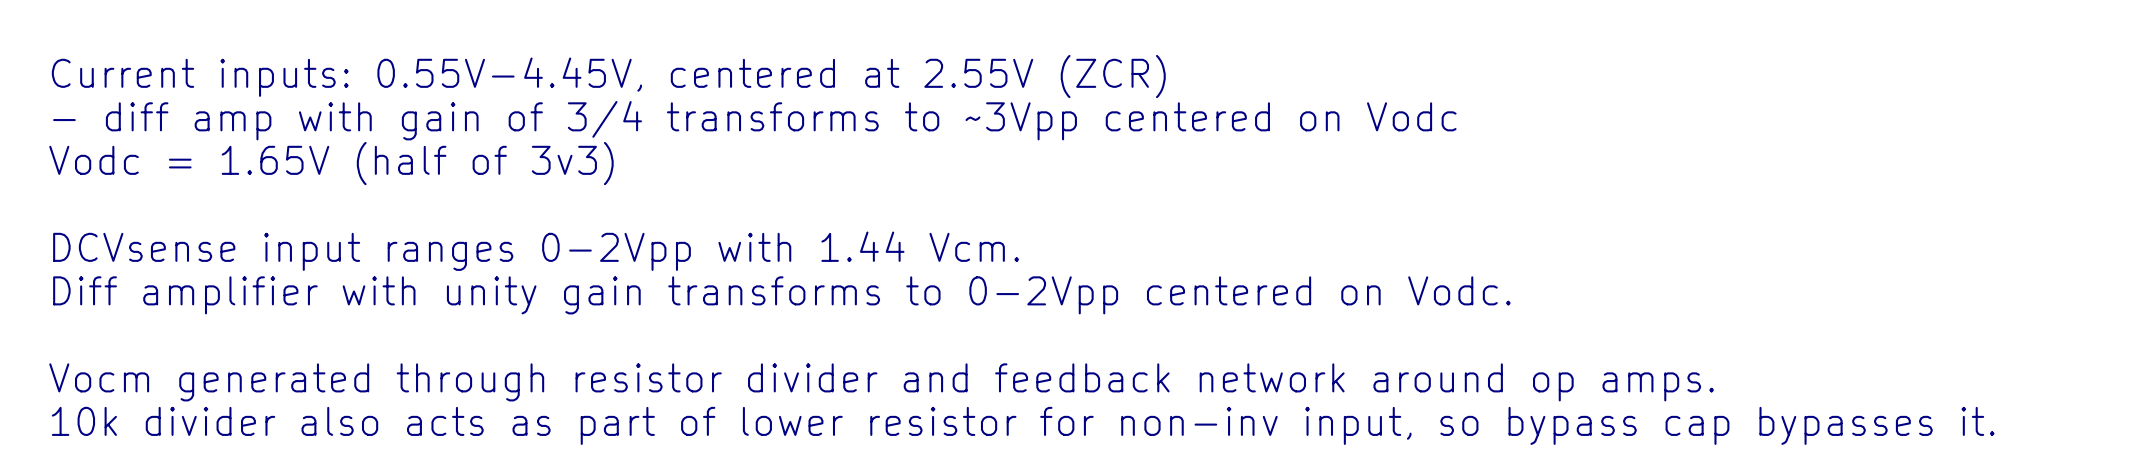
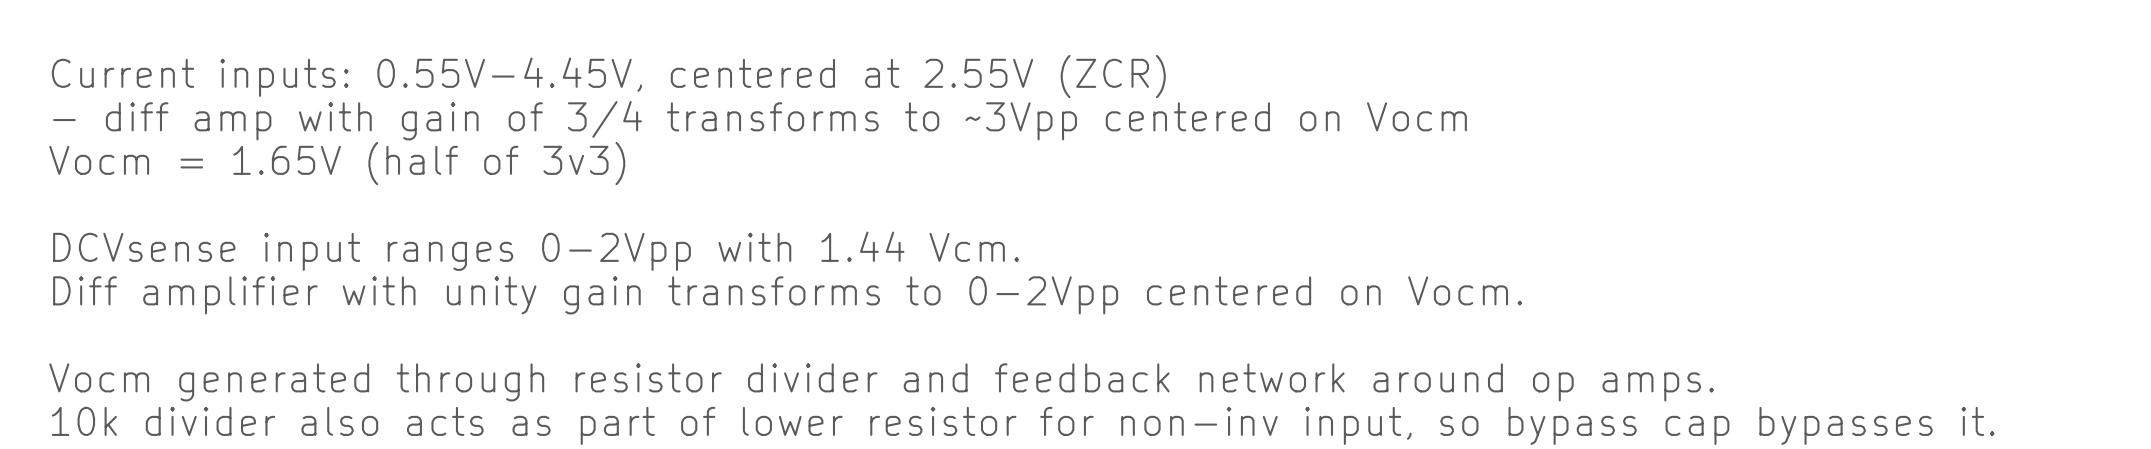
text: - diff amp with gain of 3/4 transforms to ~3Vpp centered on Vodc (754, 120) -> - diff amp with gain of 3/4 transforms to ~3Vpp centered on Vocm (759, 120)
text: Vodc = 1.65V (half of 3v3) (331, 163) -> Vocm = 1.65V (half of 3v3) (337, 163)
text: Diff amplifier with unity gain transforms to 0-2Vpp centered on Vodc. (781, 295) -> Diff amplifier with unity gain transforms to 0-2Vpp centered on Vocm. (787, 295)

